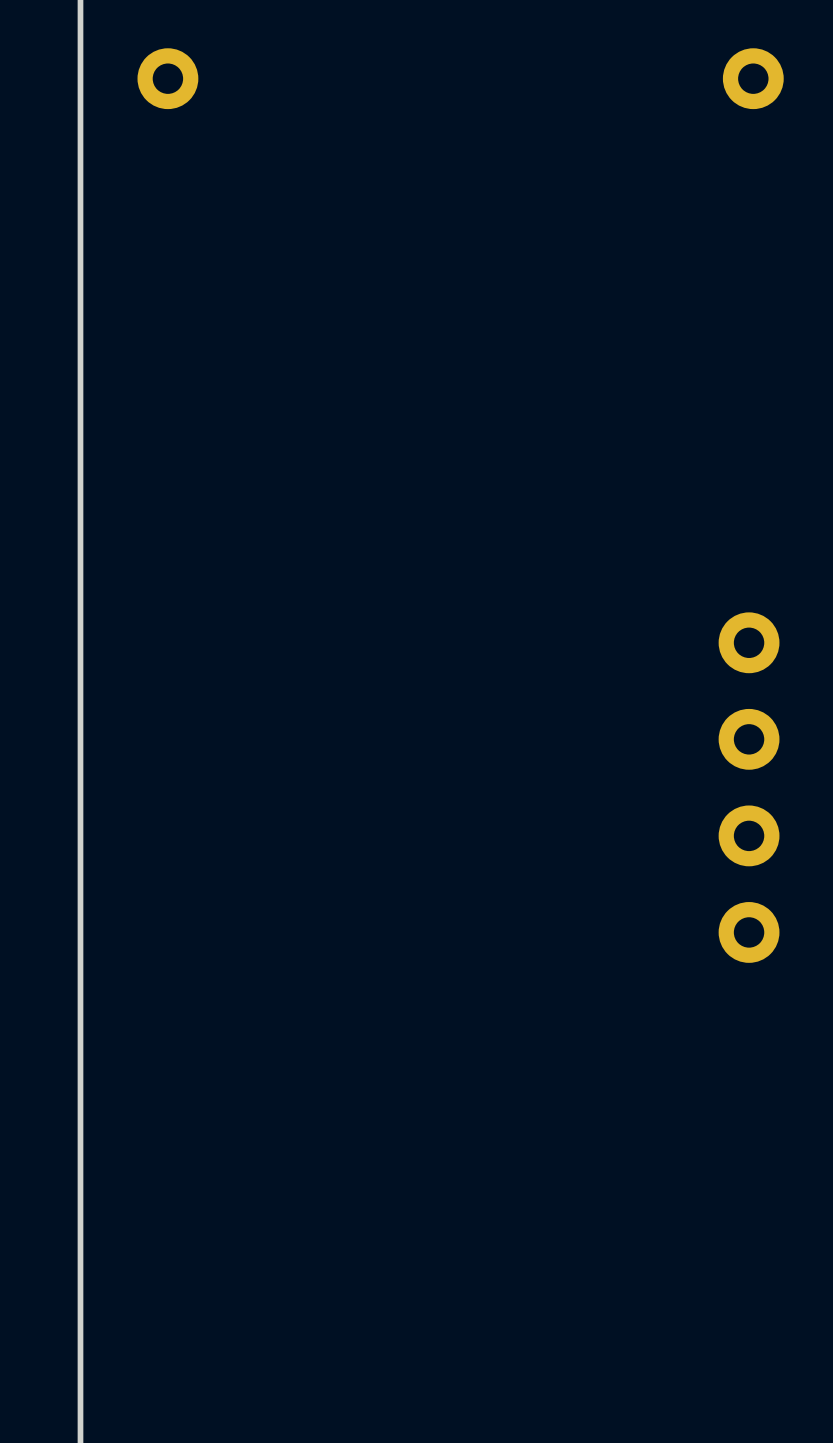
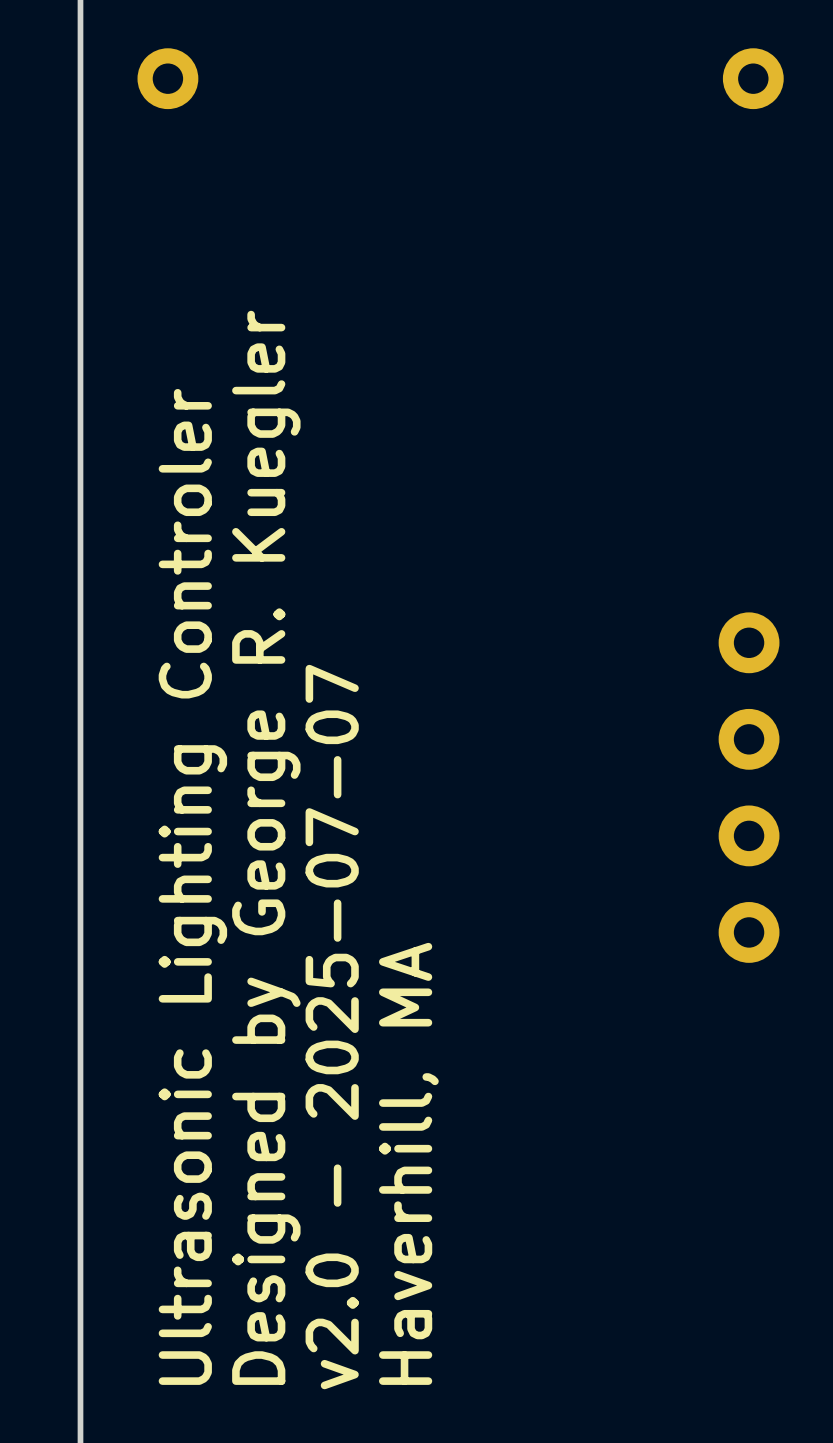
text: none -> Designed by George R. Kuegler (266, 847)
text: none -> Ultrasonic Lighting Controler (192, 886)
text: none -> v2.0 - 2025-07-07 (332, 1027)
text: none -> Haverhill, MA (408, 1163)

